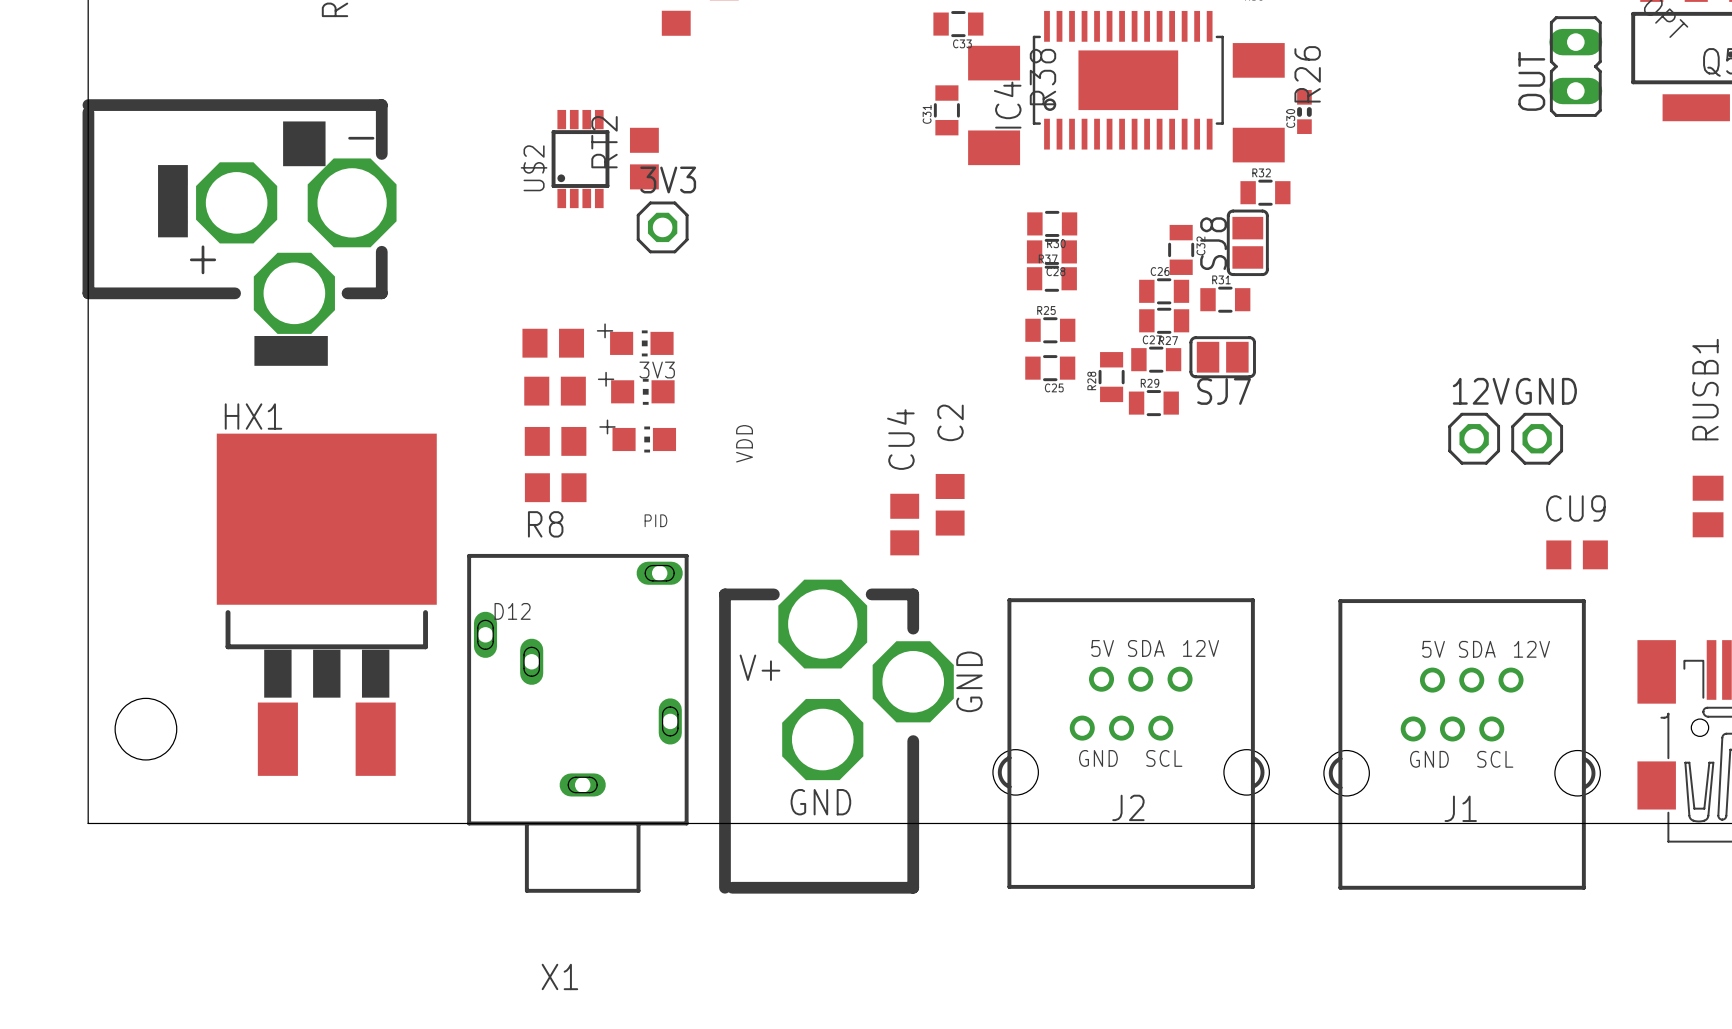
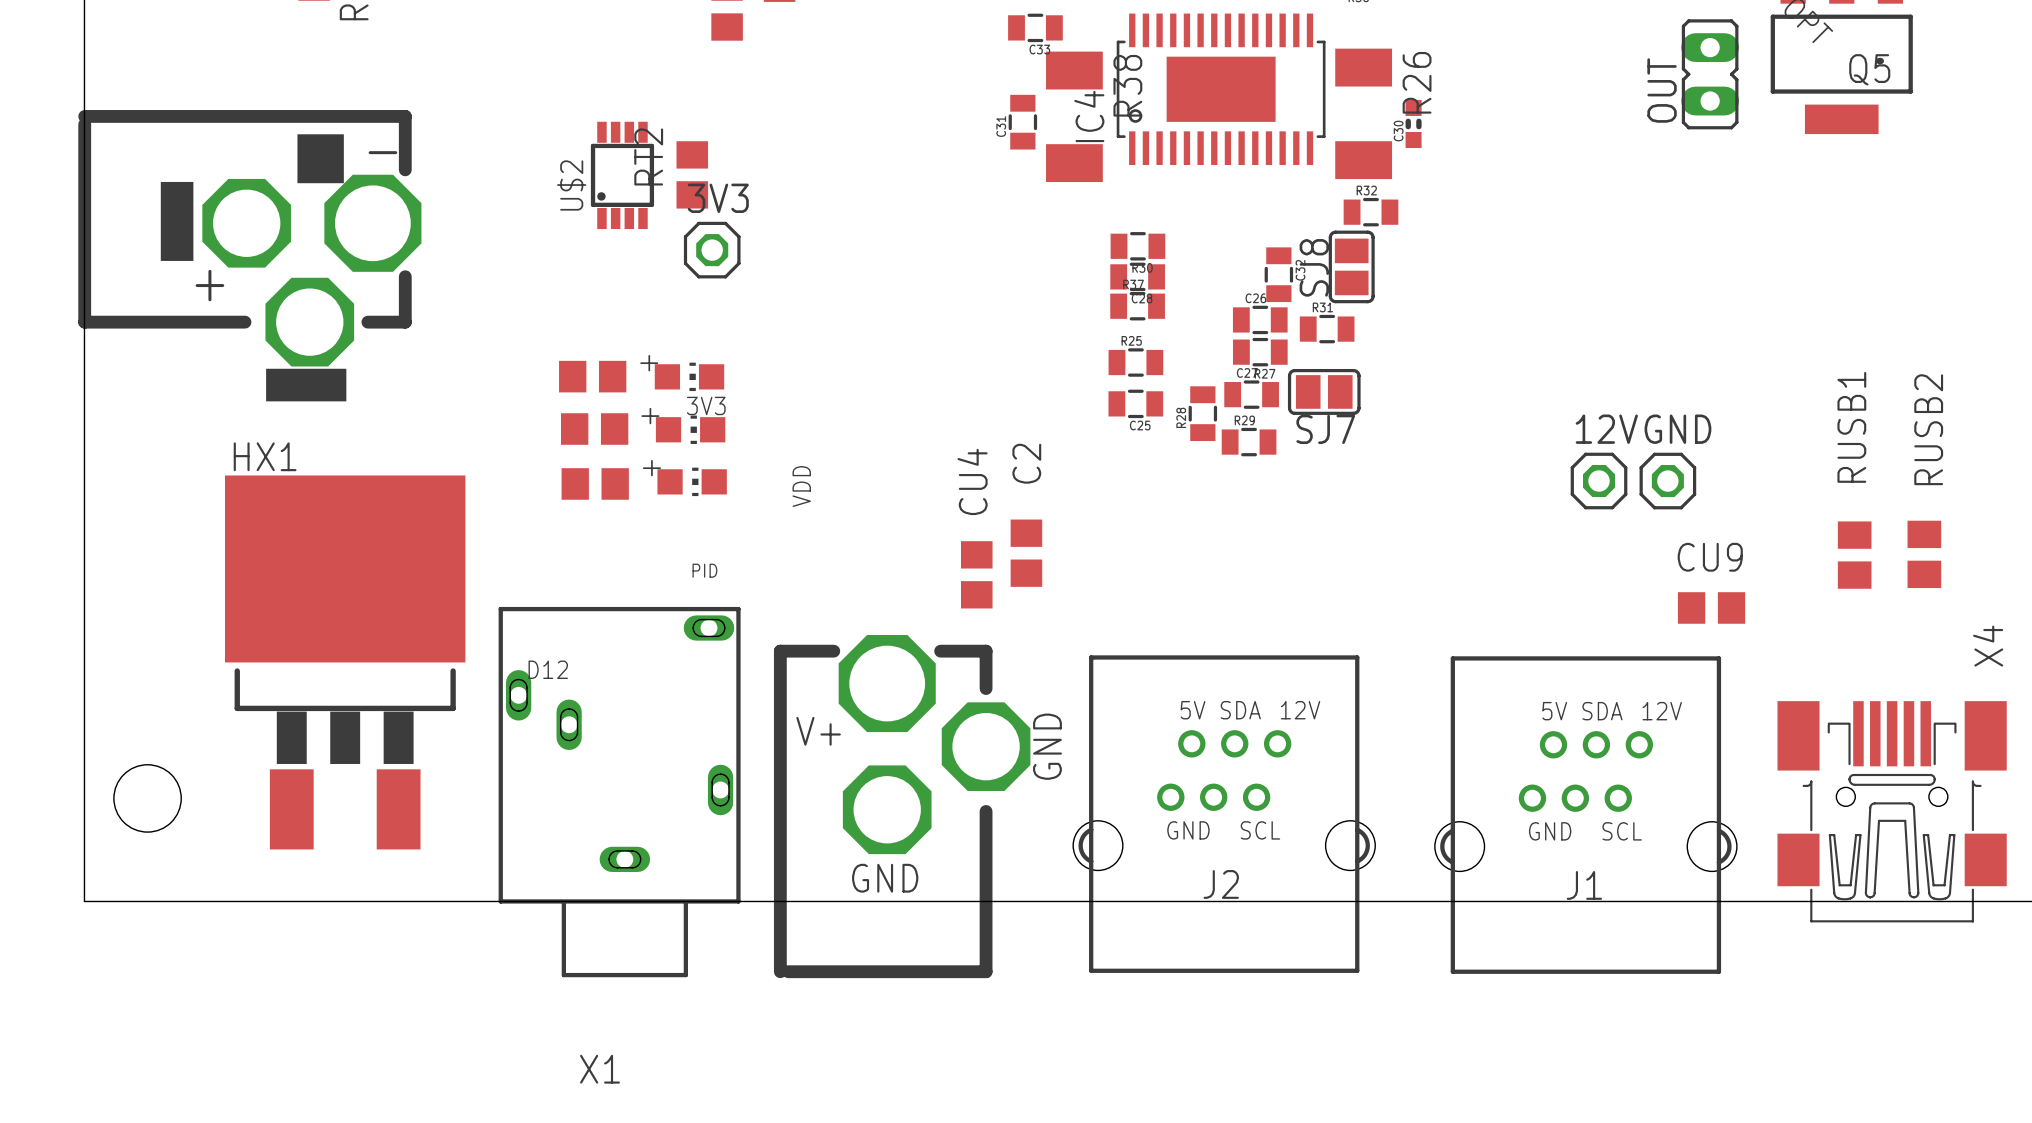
R8: (555, 487) -> none

